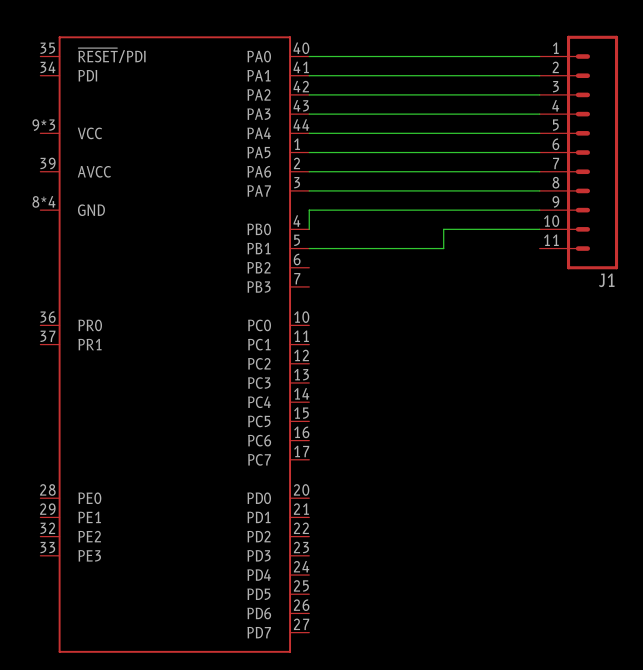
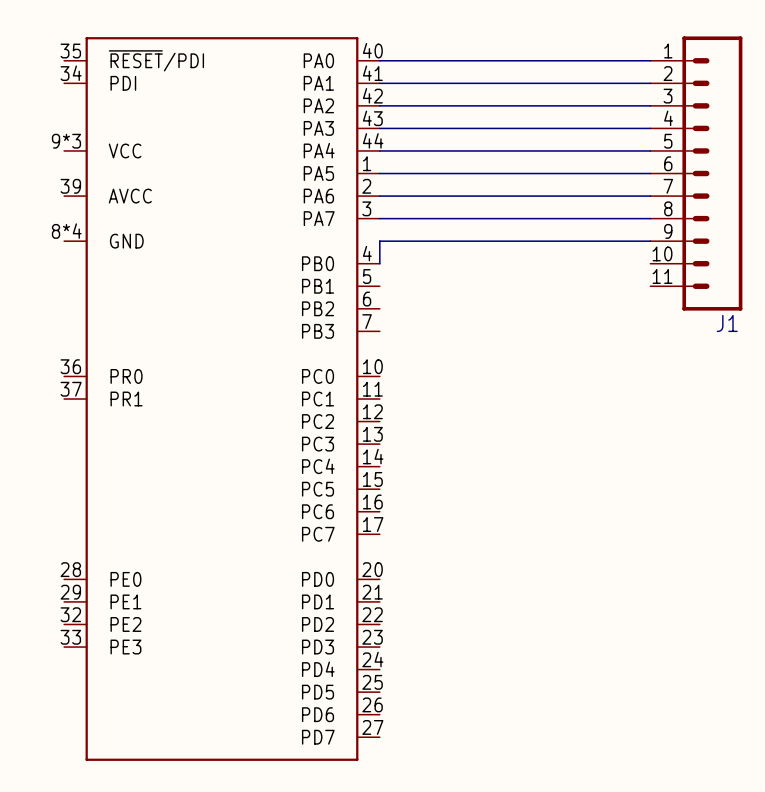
wire: (539, 229) (443, 229) (443, 248) (309, 248) -> none

